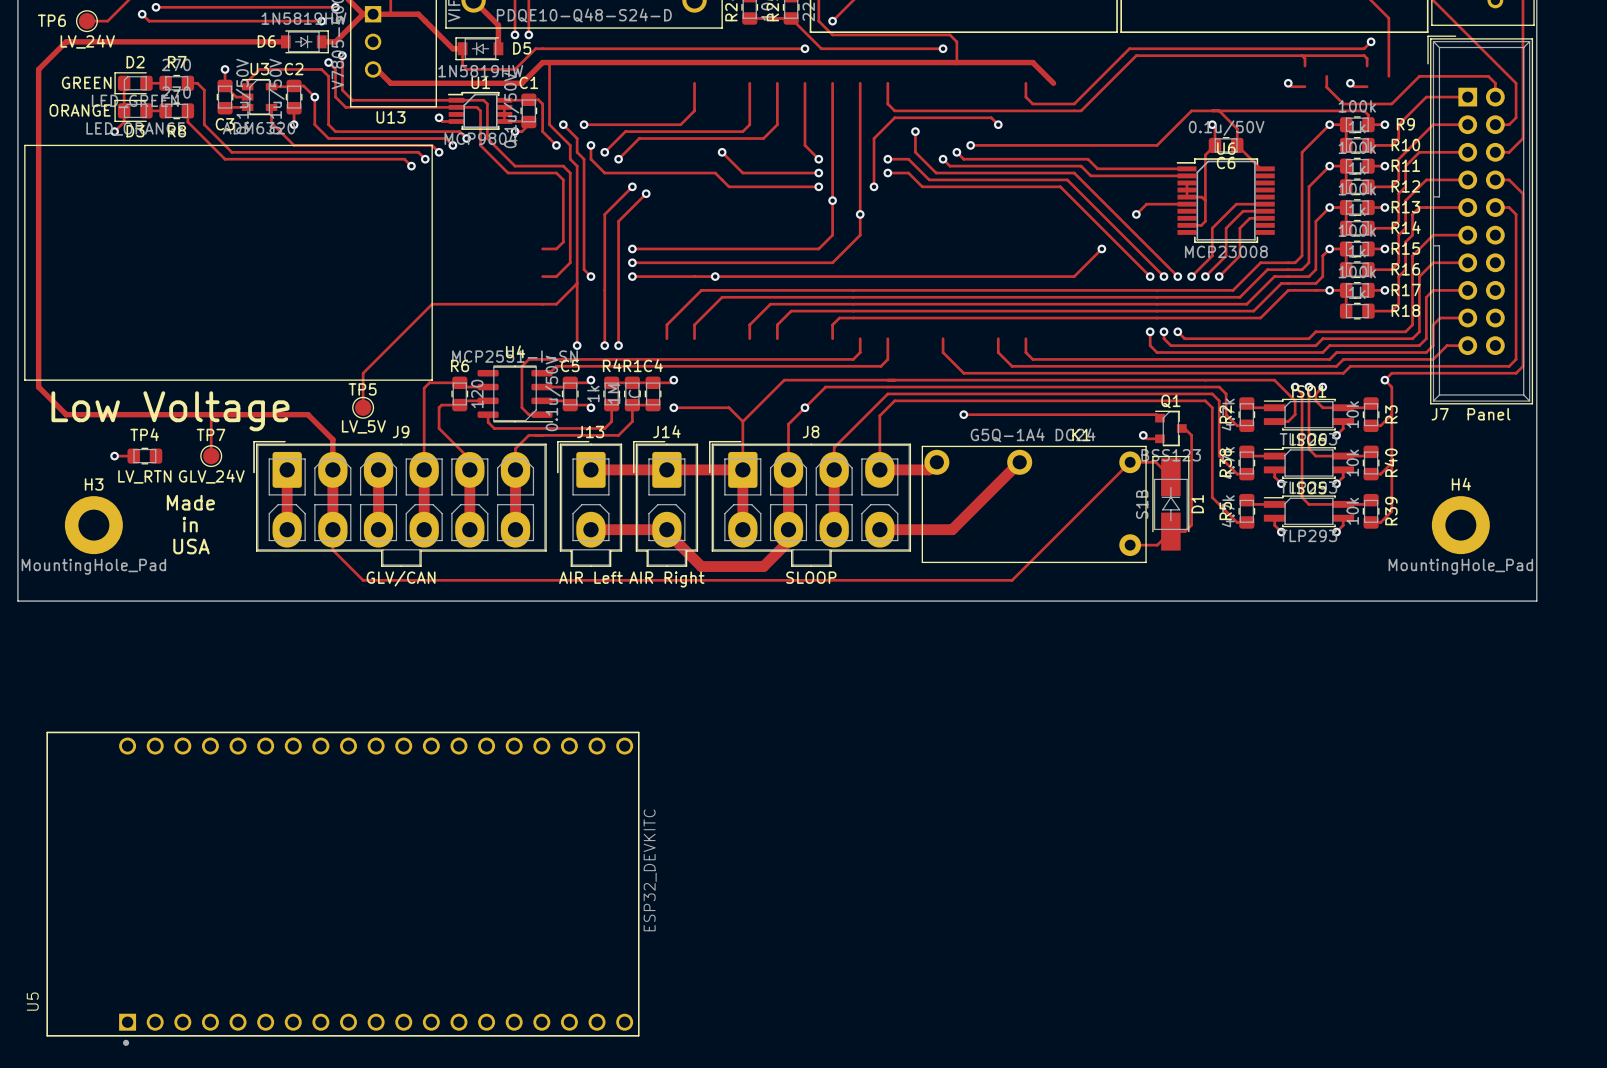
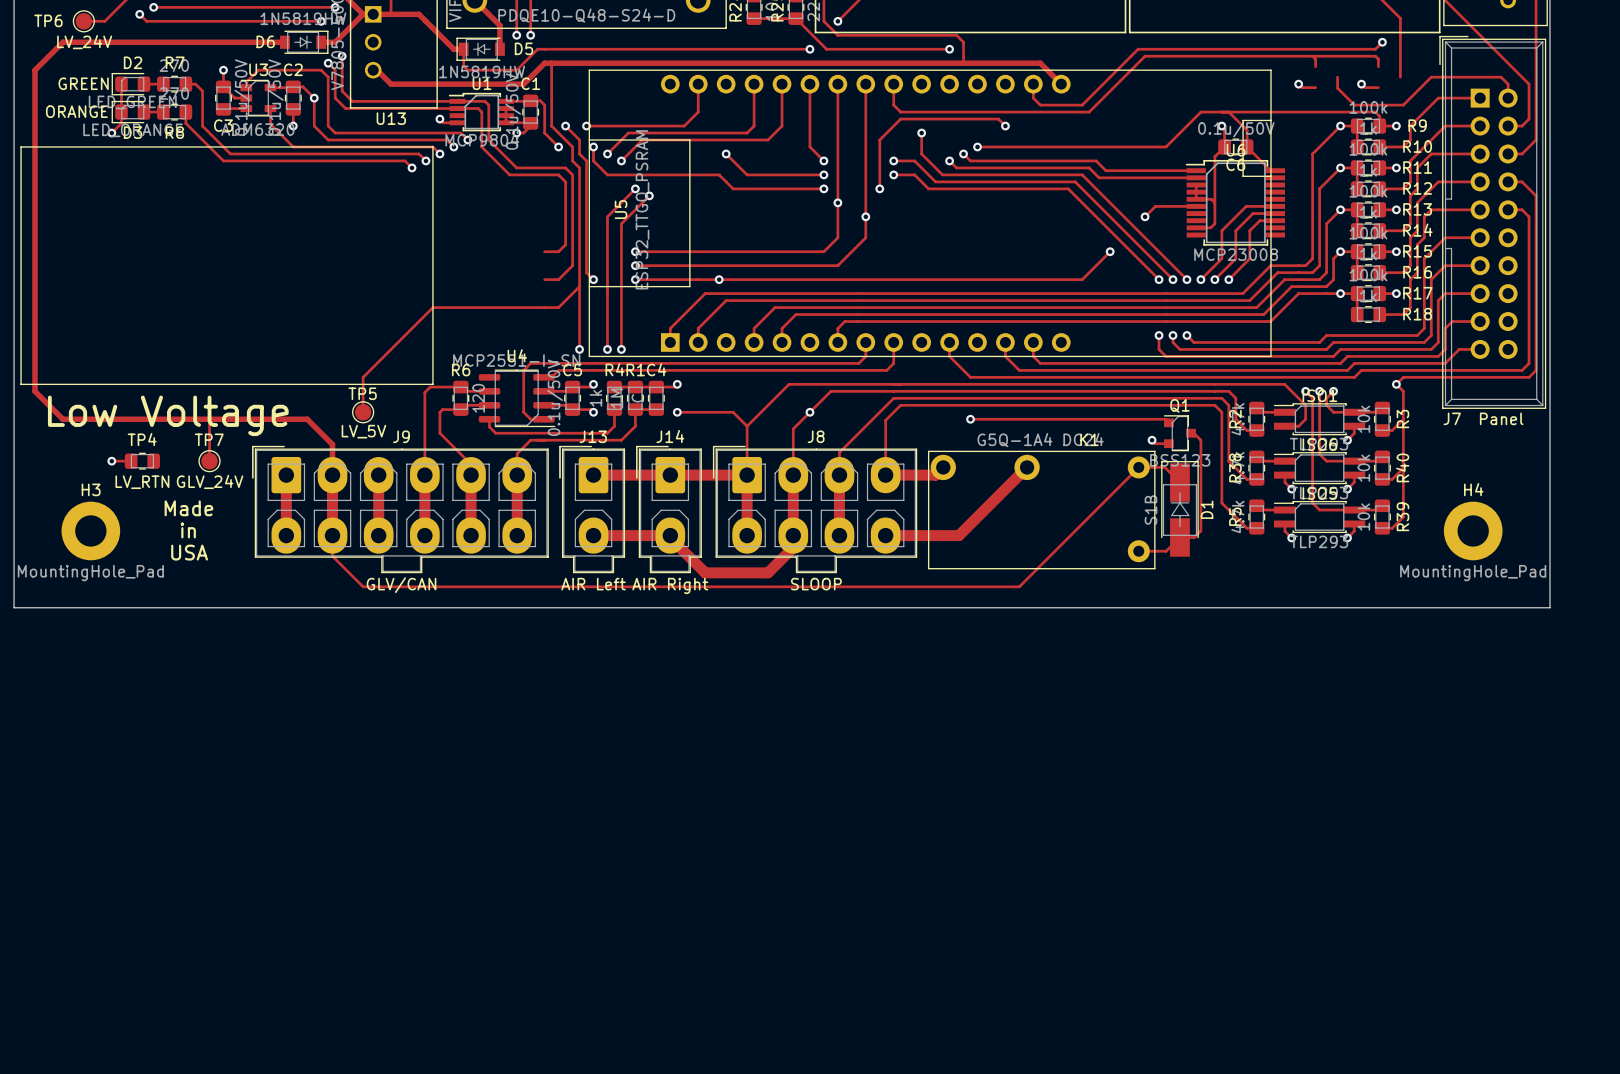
U5 footprint: [46, 731, 640, 1046] -> [588, 69, 1272, 358]
U5 value: ESP32_DEVKITC (650, 870) -> ESP32_TTGO_PSRAM (642, 209)
U5 name position: U5 (32, 1001) -> U5 (621, 209)

